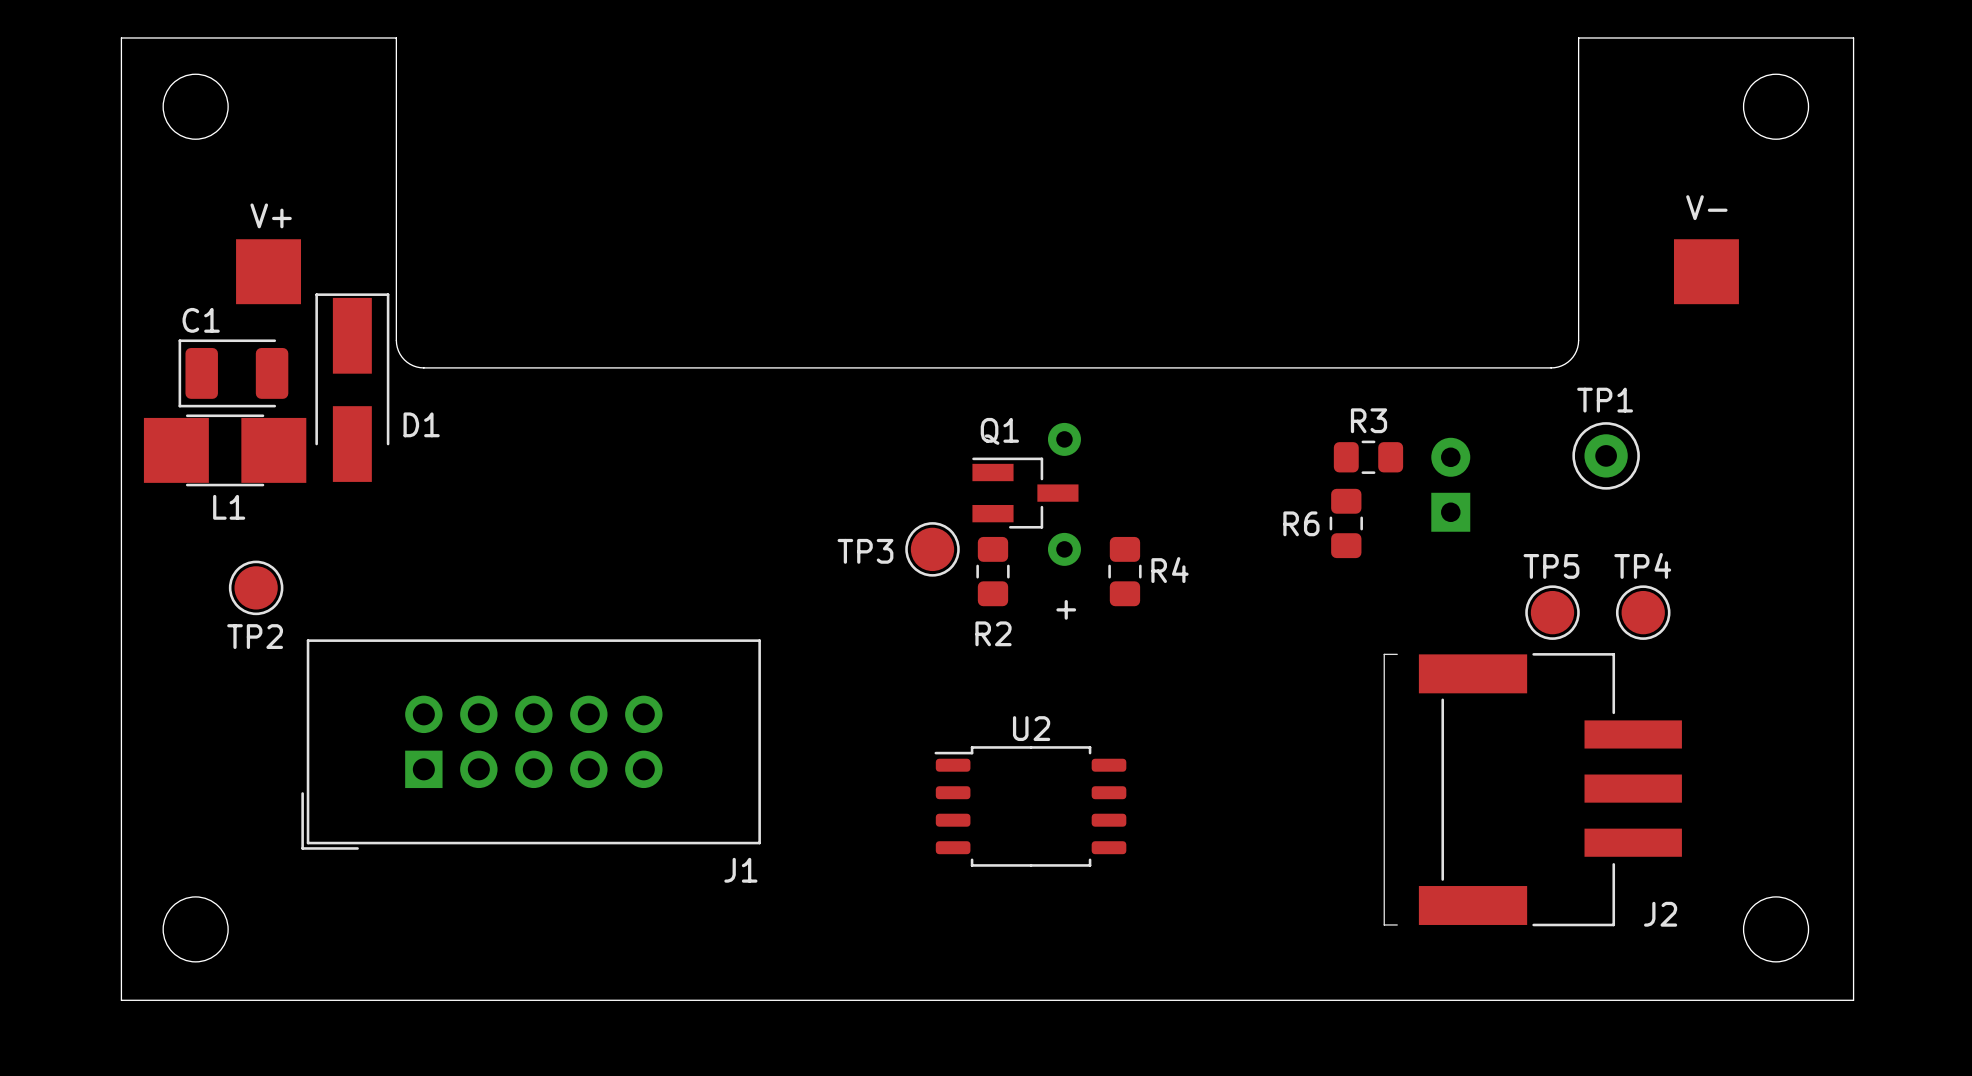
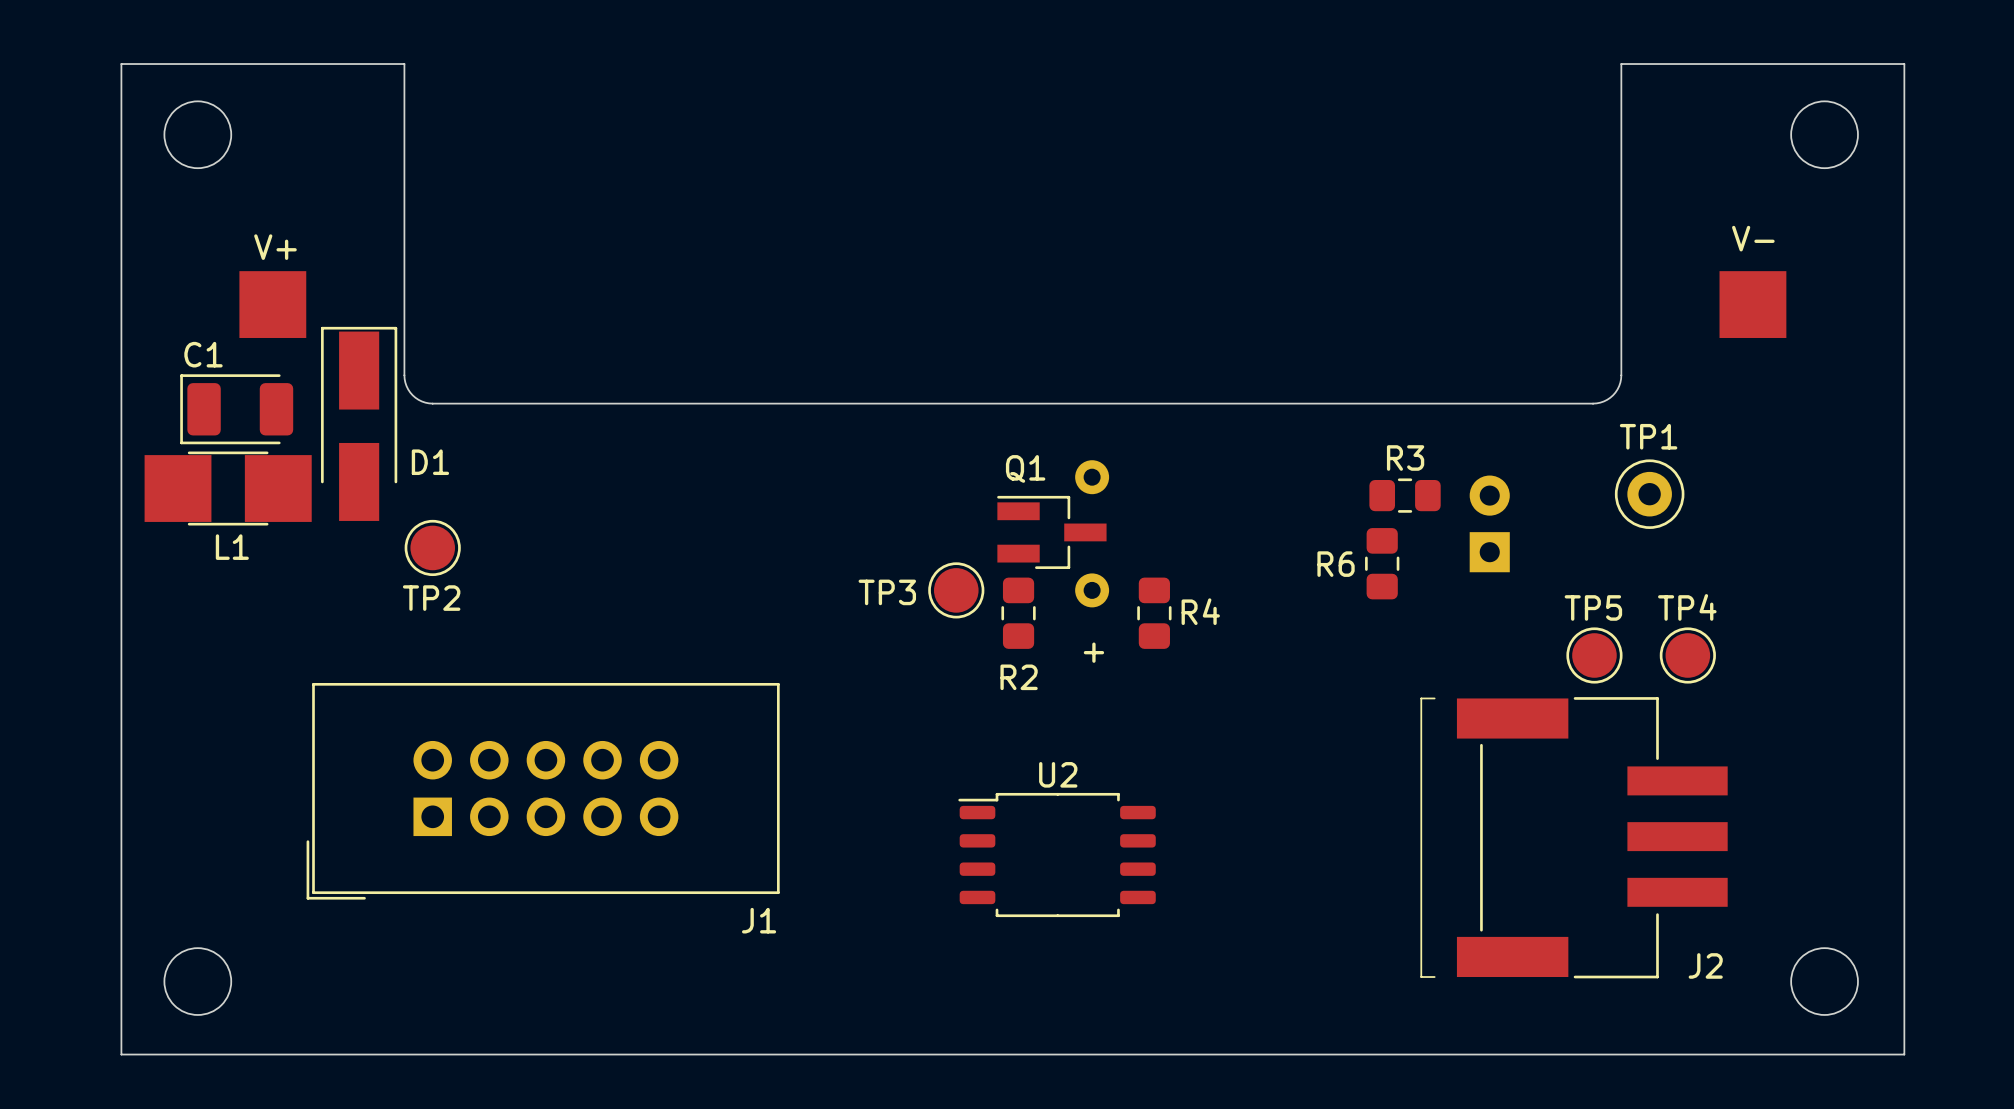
TP2 position: (256, 587) -> (432, 547)

